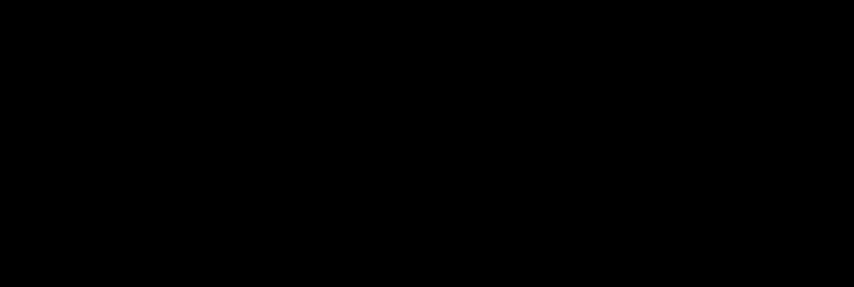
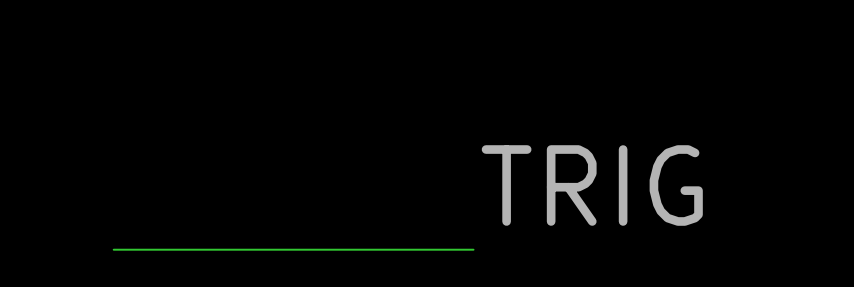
label: none -> TRIG (592, 185)
wire: none -> (113, 249) (473, 249)

